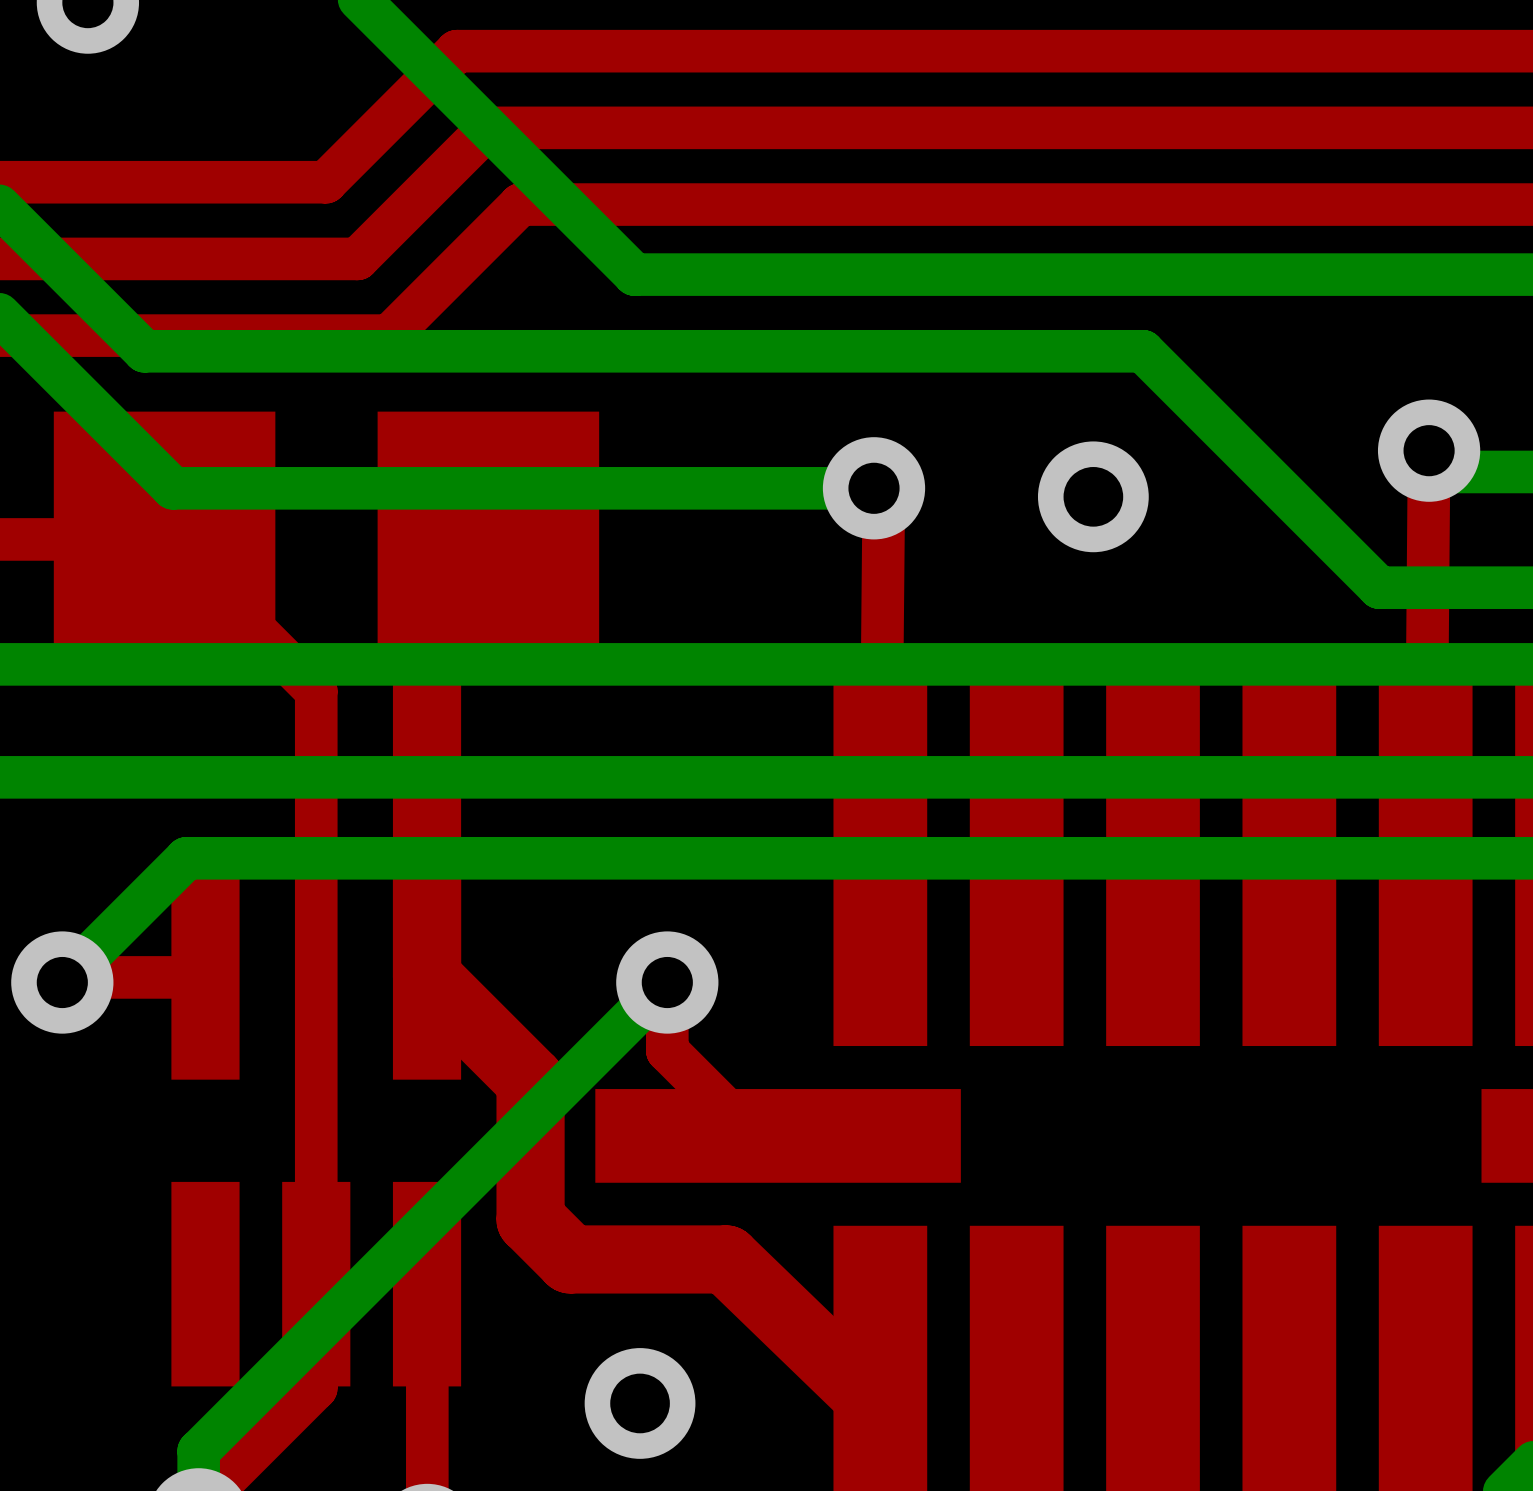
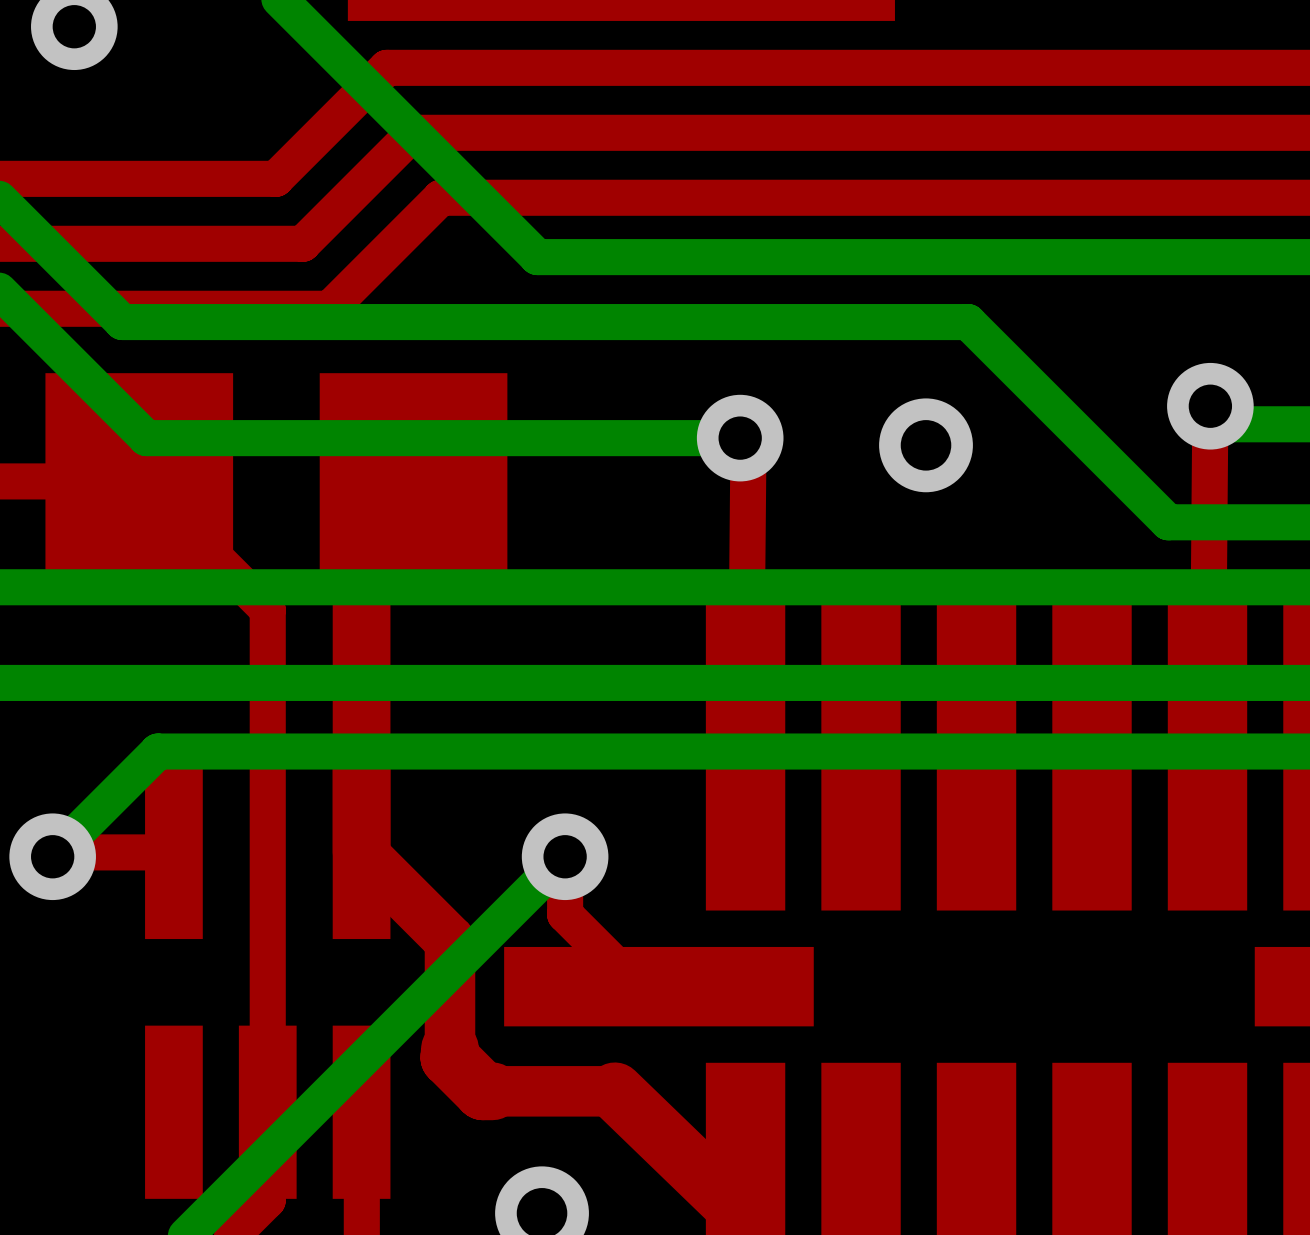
top track width: thick (427, 977) (530, 1080) (530, 1219) -> thin (361, 852) (449, 940) (449, 1057)
top track width: thick (726, 1259) (581, 1259) -> thin (614, 1091) (492, 1091)

